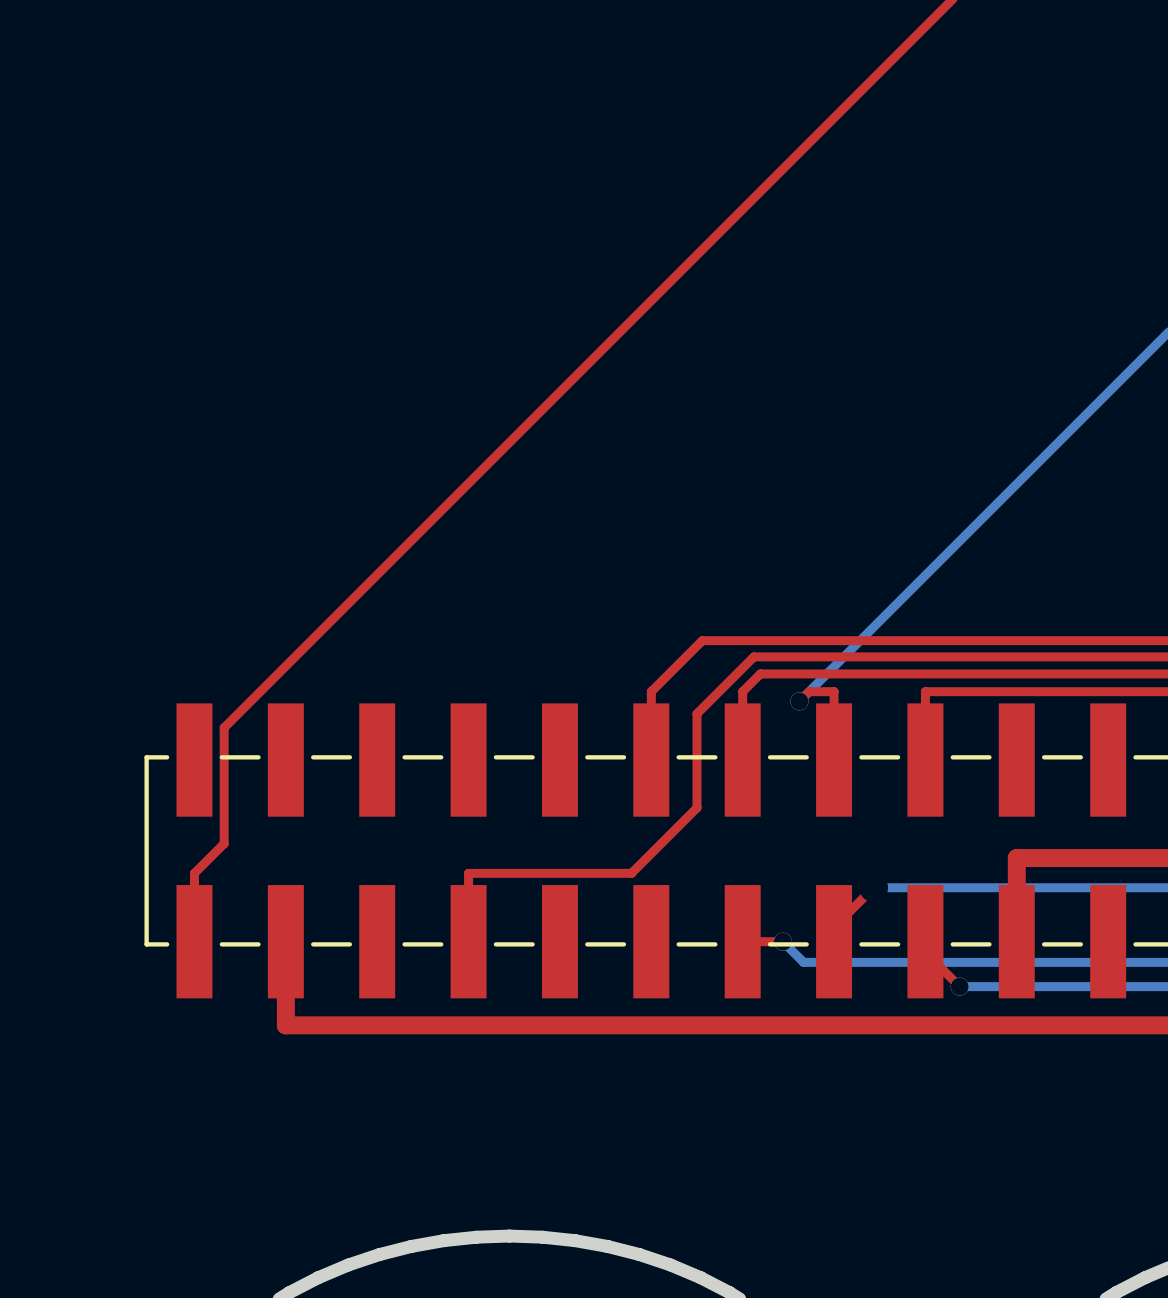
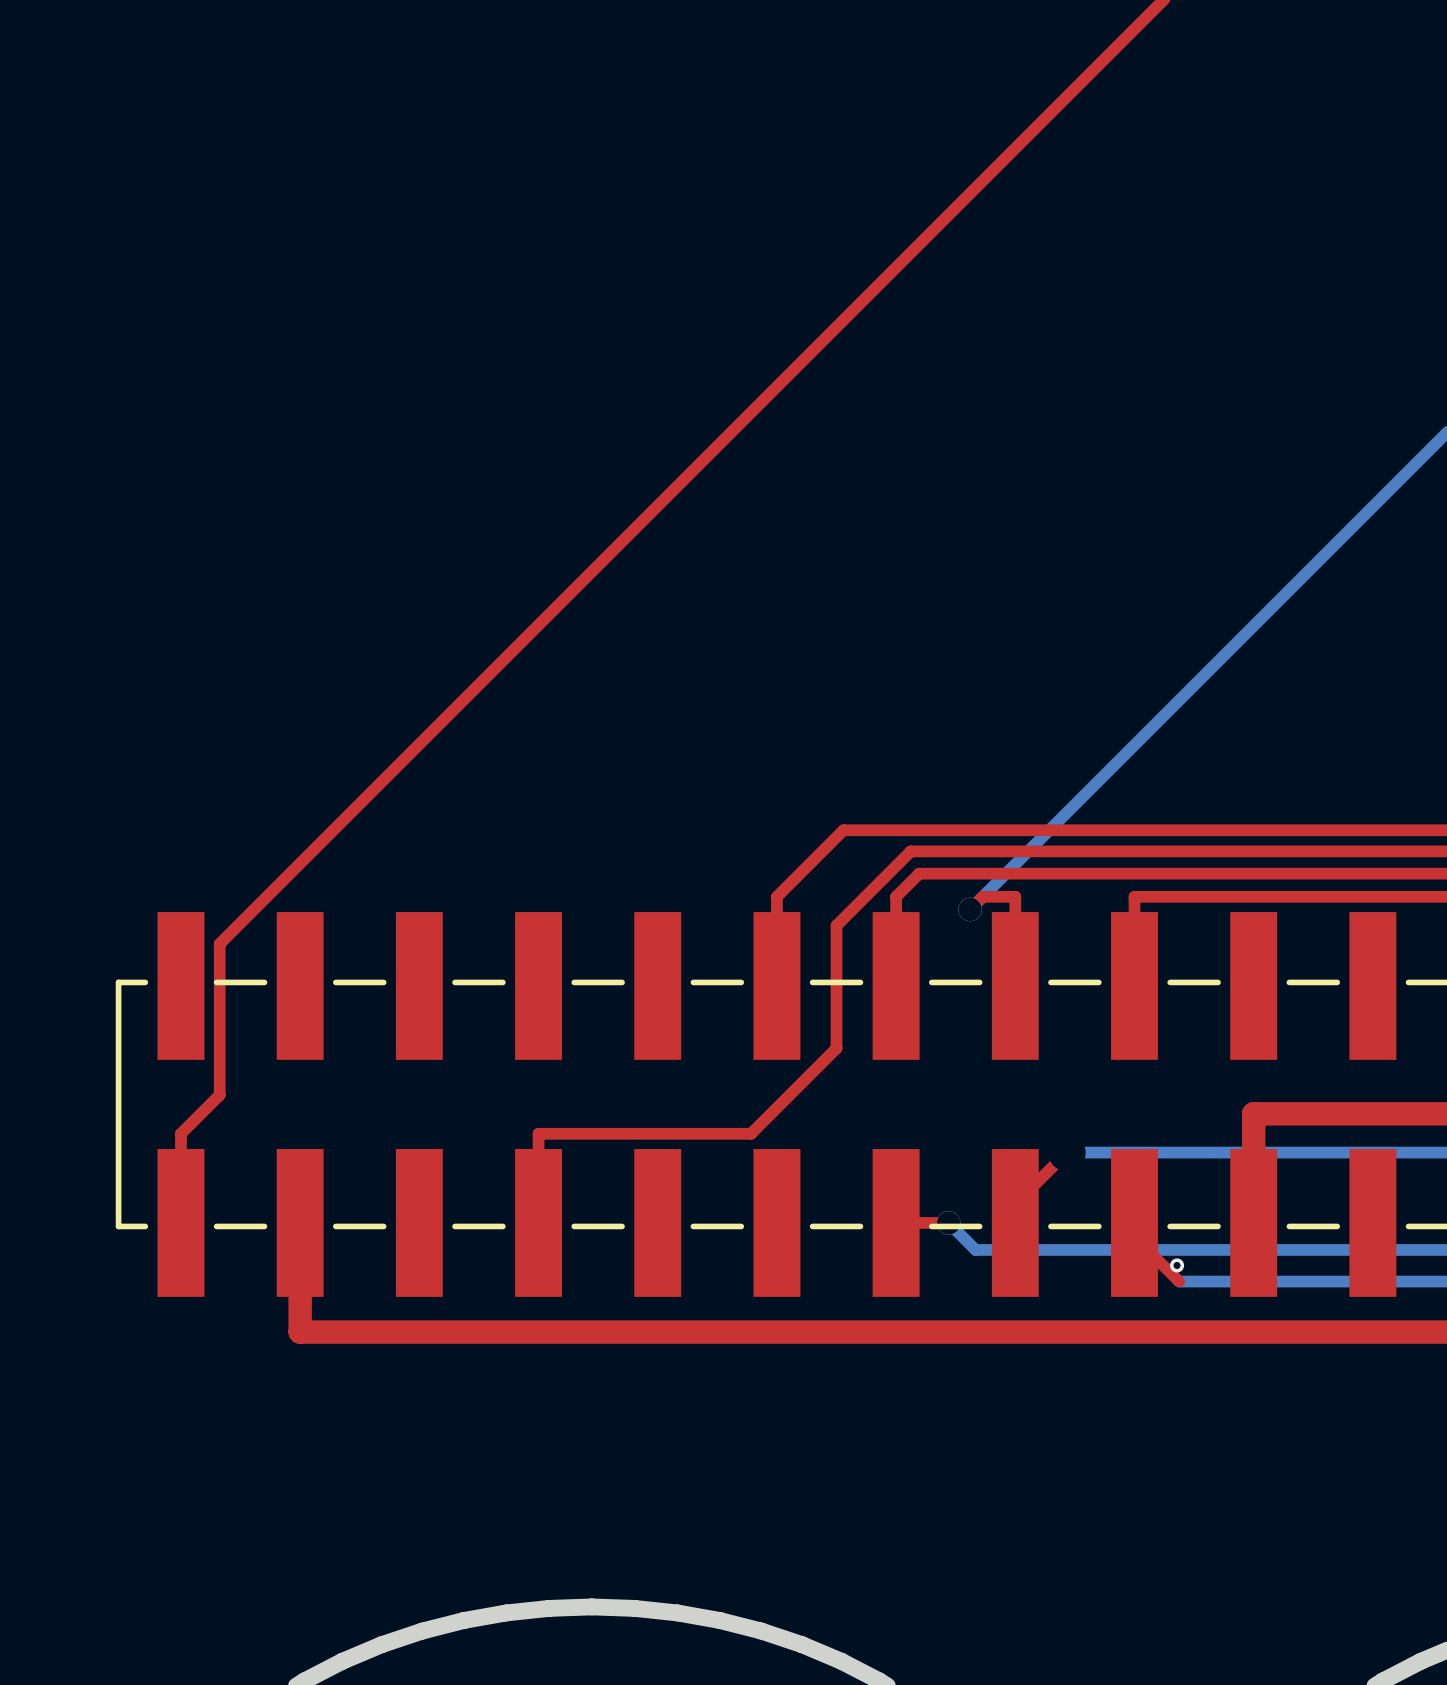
via size: [950, 977, 969, 996] -> [1170, 1258, 1185, 1273]

